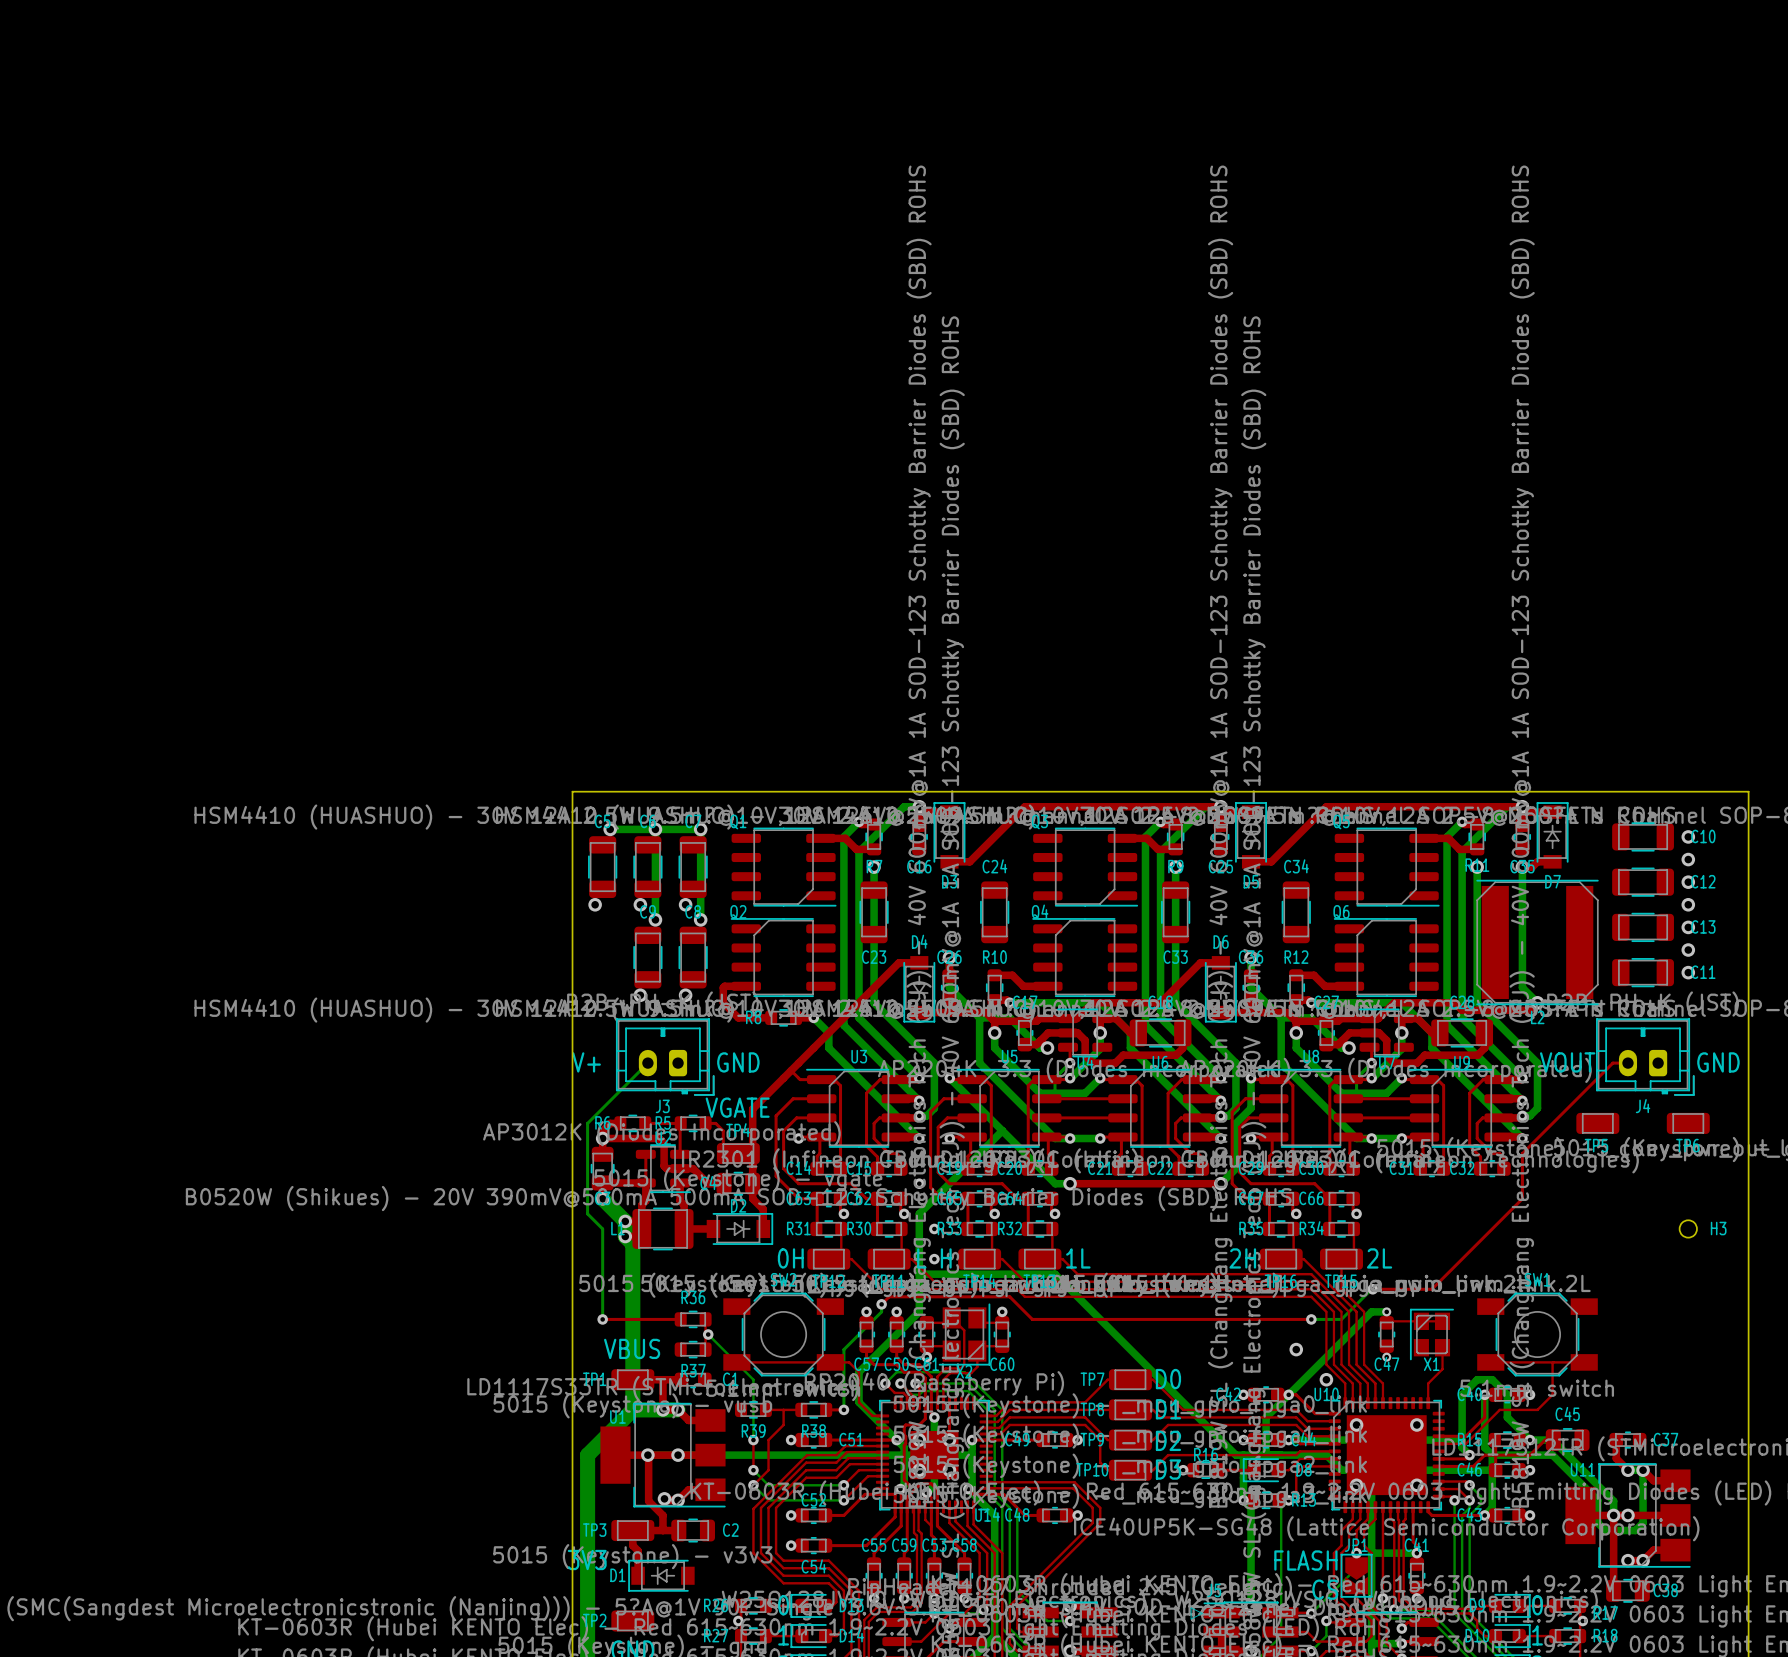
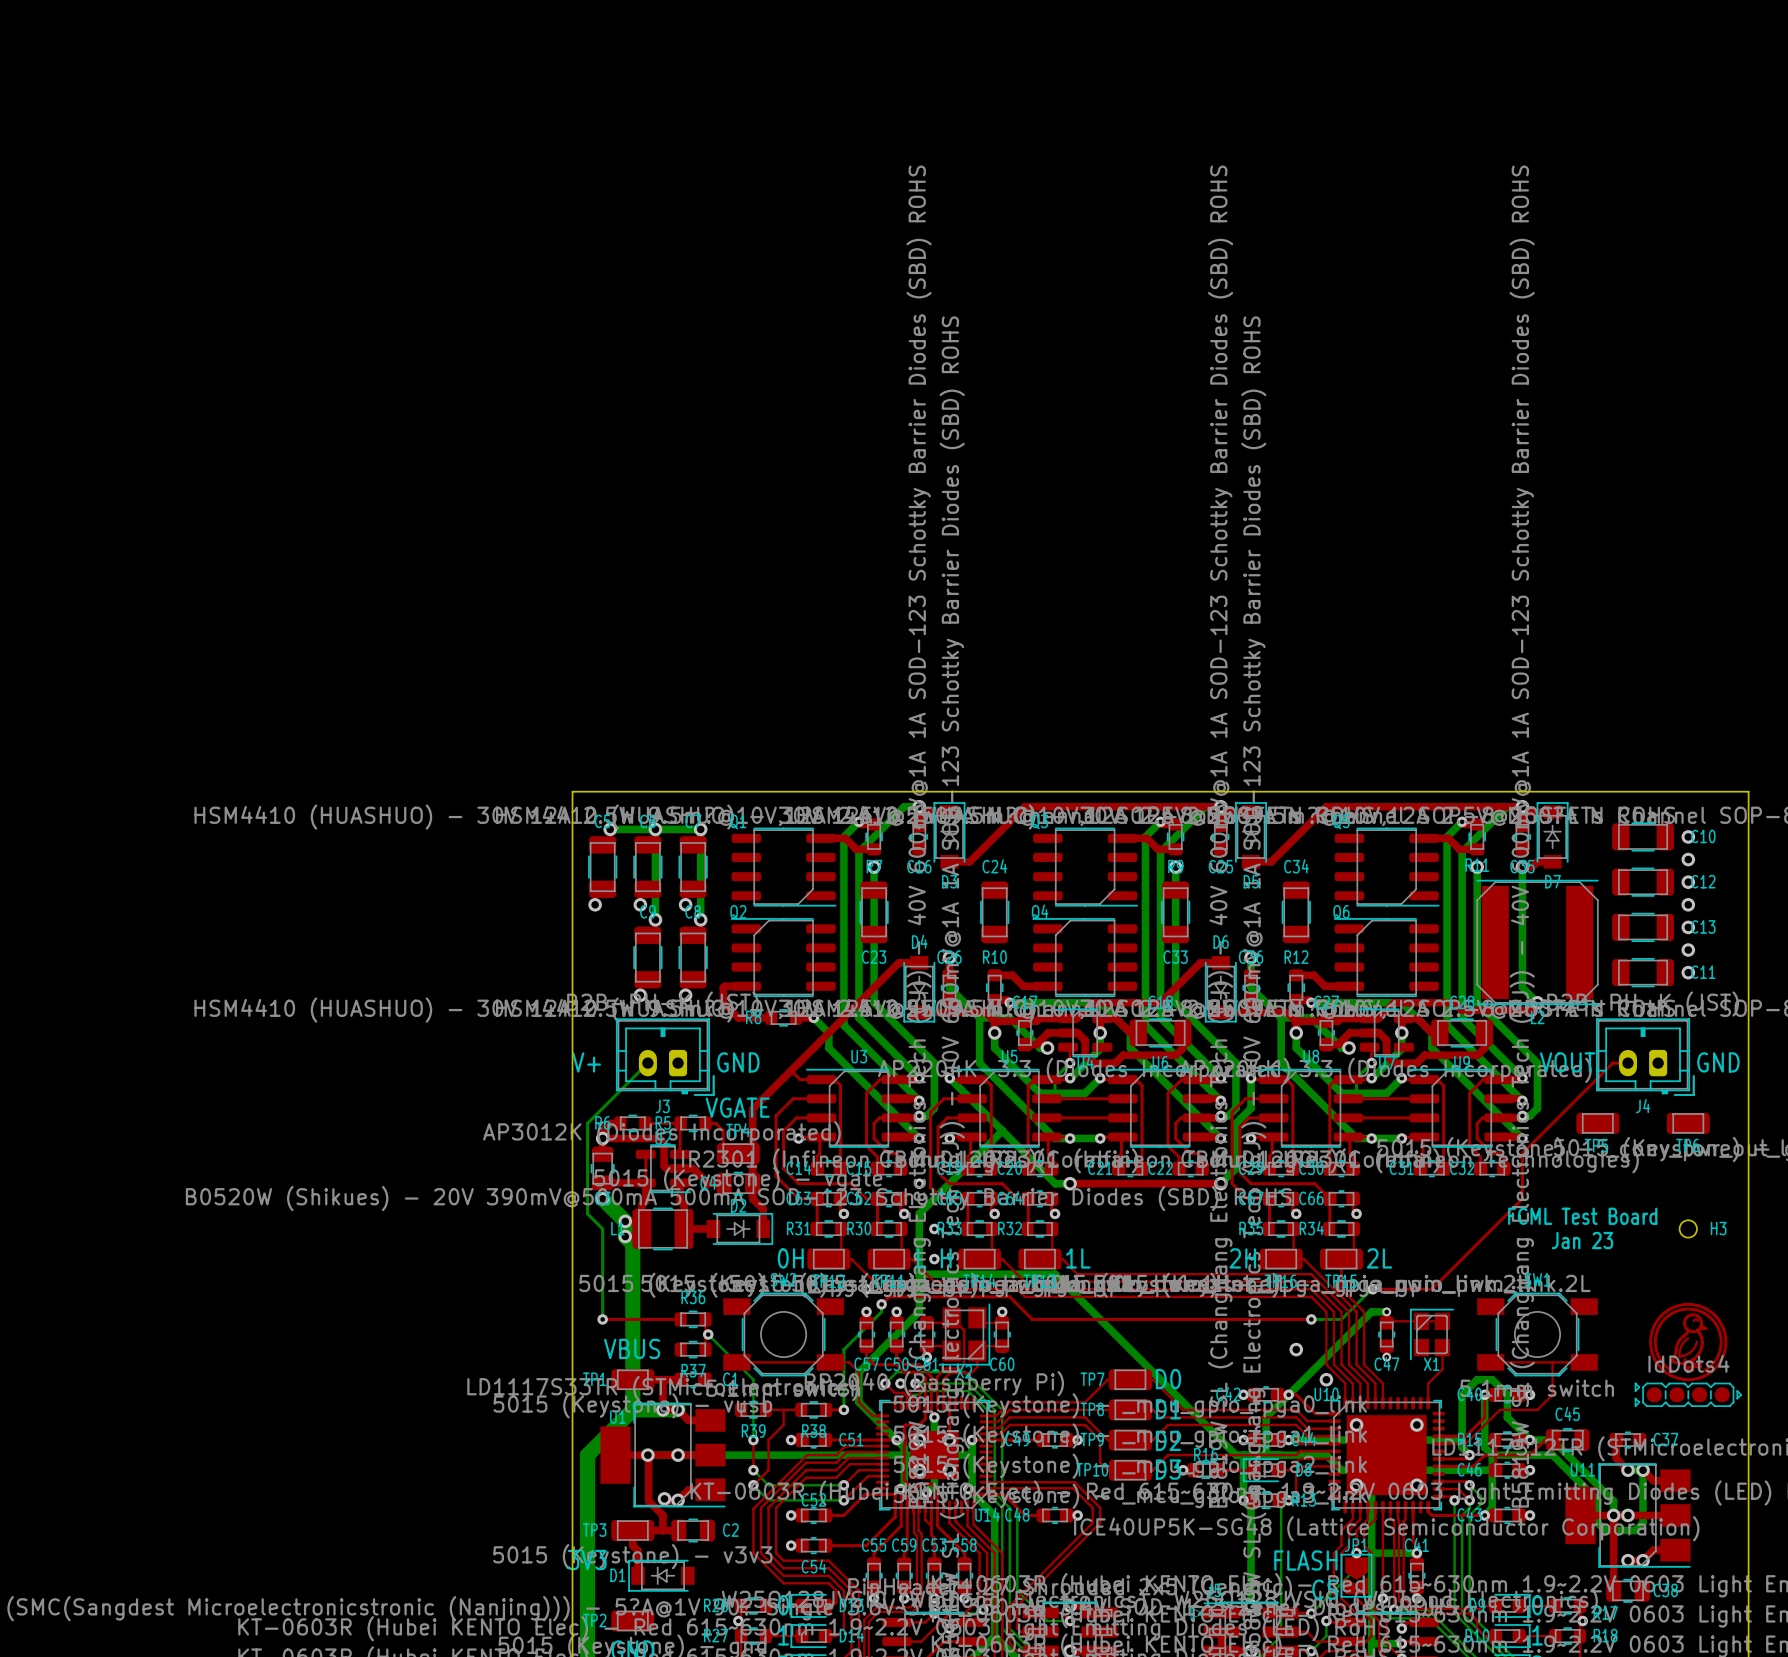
text: none -> FCML Test Board (1582, 1216)
text: none -> Jan 23 (1582, 1240)
drawing: none -> [1634, 1302, 1742, 1407]

